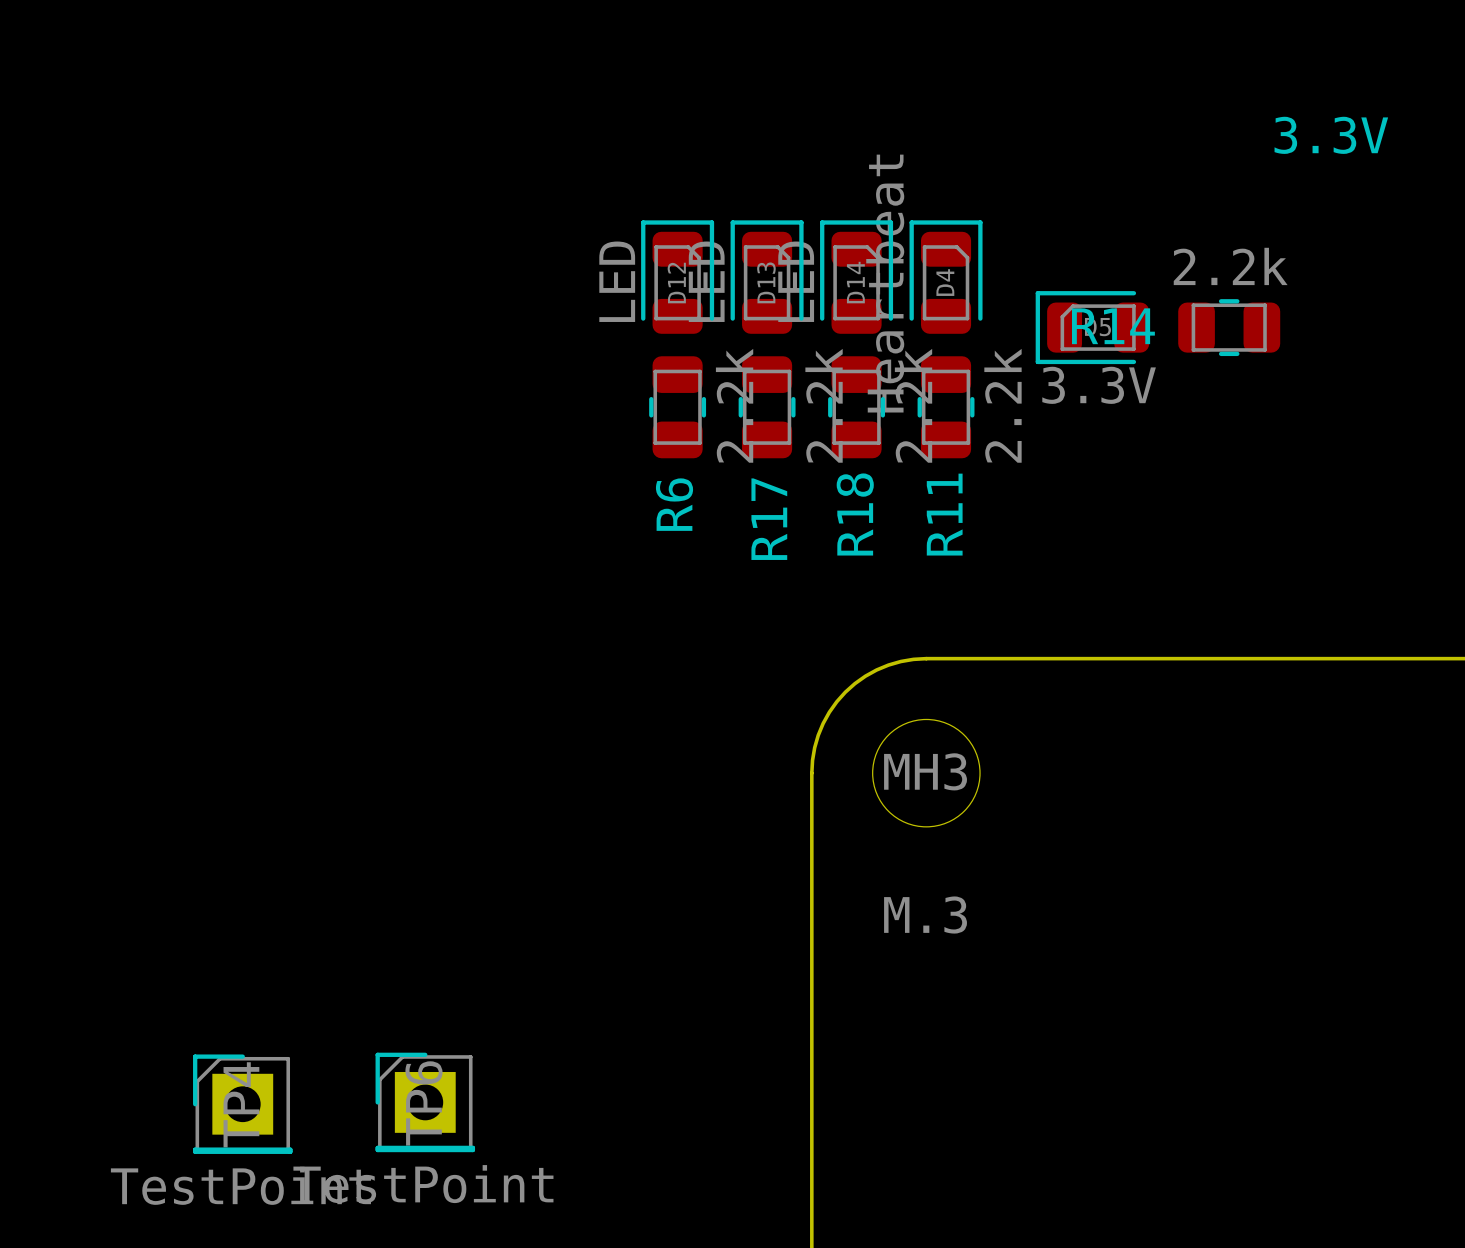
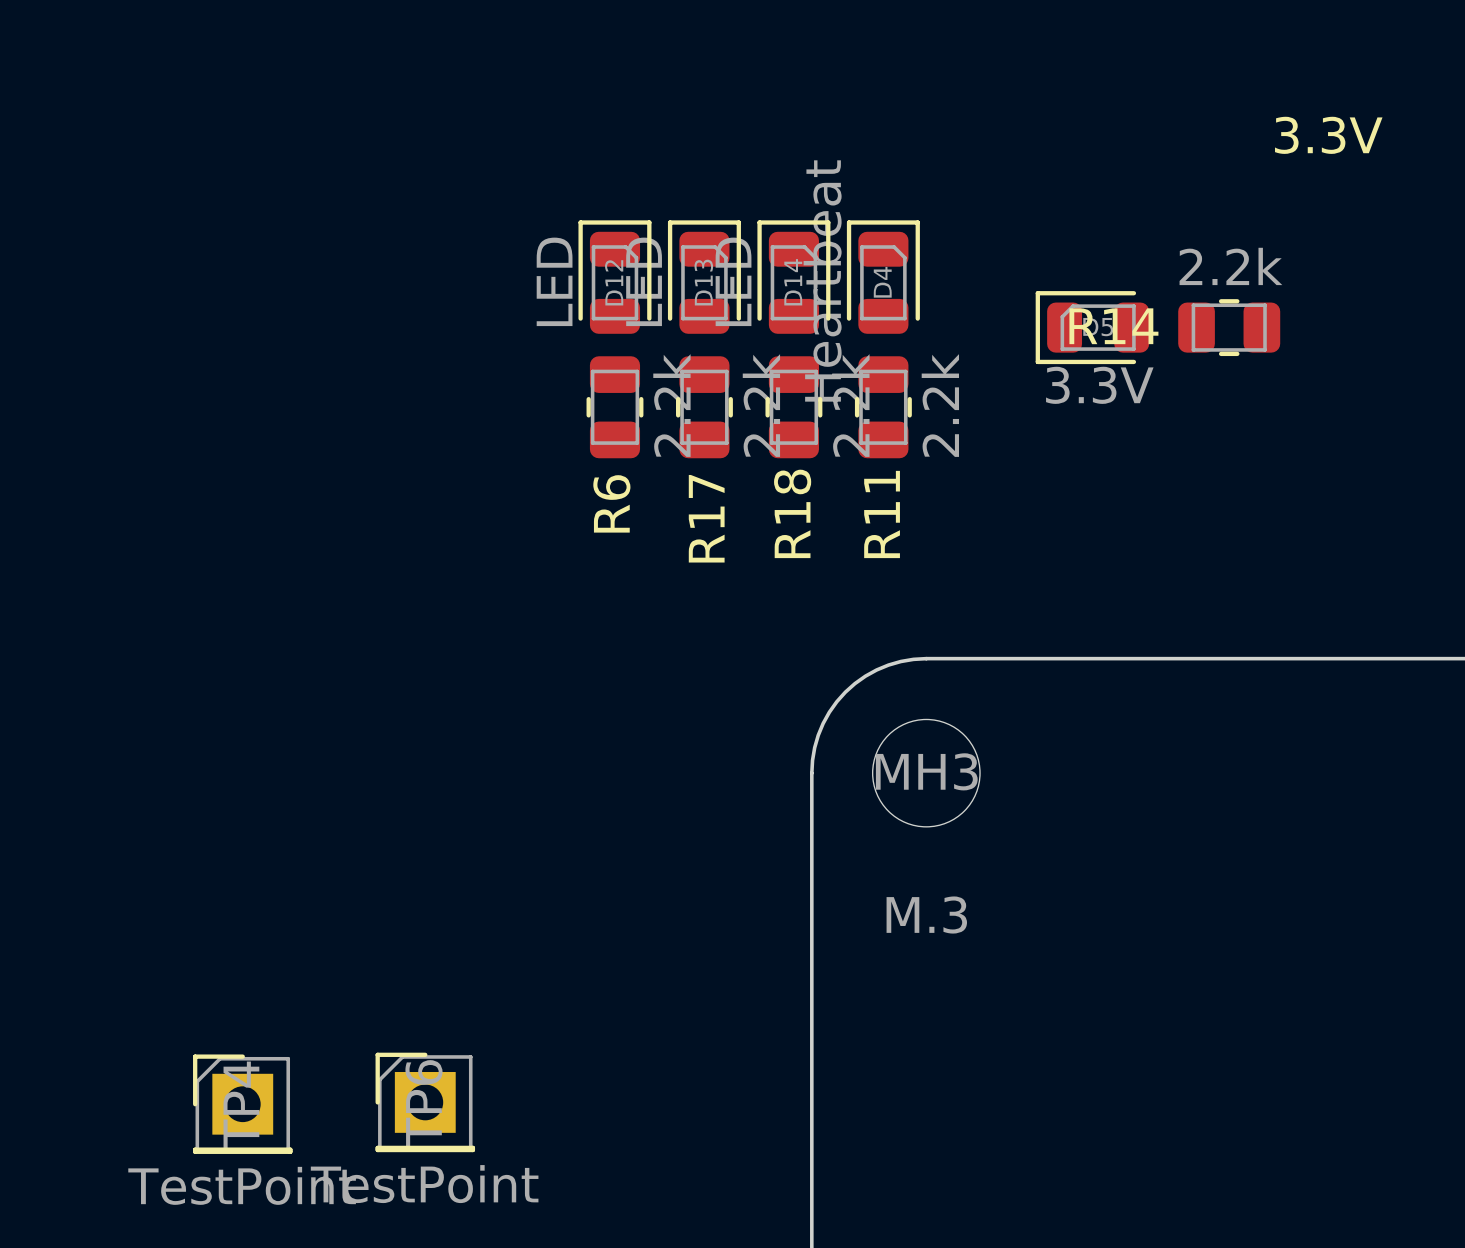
D12 position: (677, 277) -> (614, 277)
D13 position: (767, 277) -> (704, 277)
D14 position: (856, 277) -> (793, 277)
D4 position: (946, 277) -> (883, 277)
R6 position: (677, 407) -> (614, 407)
R17 position: (767, 407) -> (704, 407)
R18 position: (856, 407) -> (793, 407)
R11 position: (946, 407) -> (883, 407)

